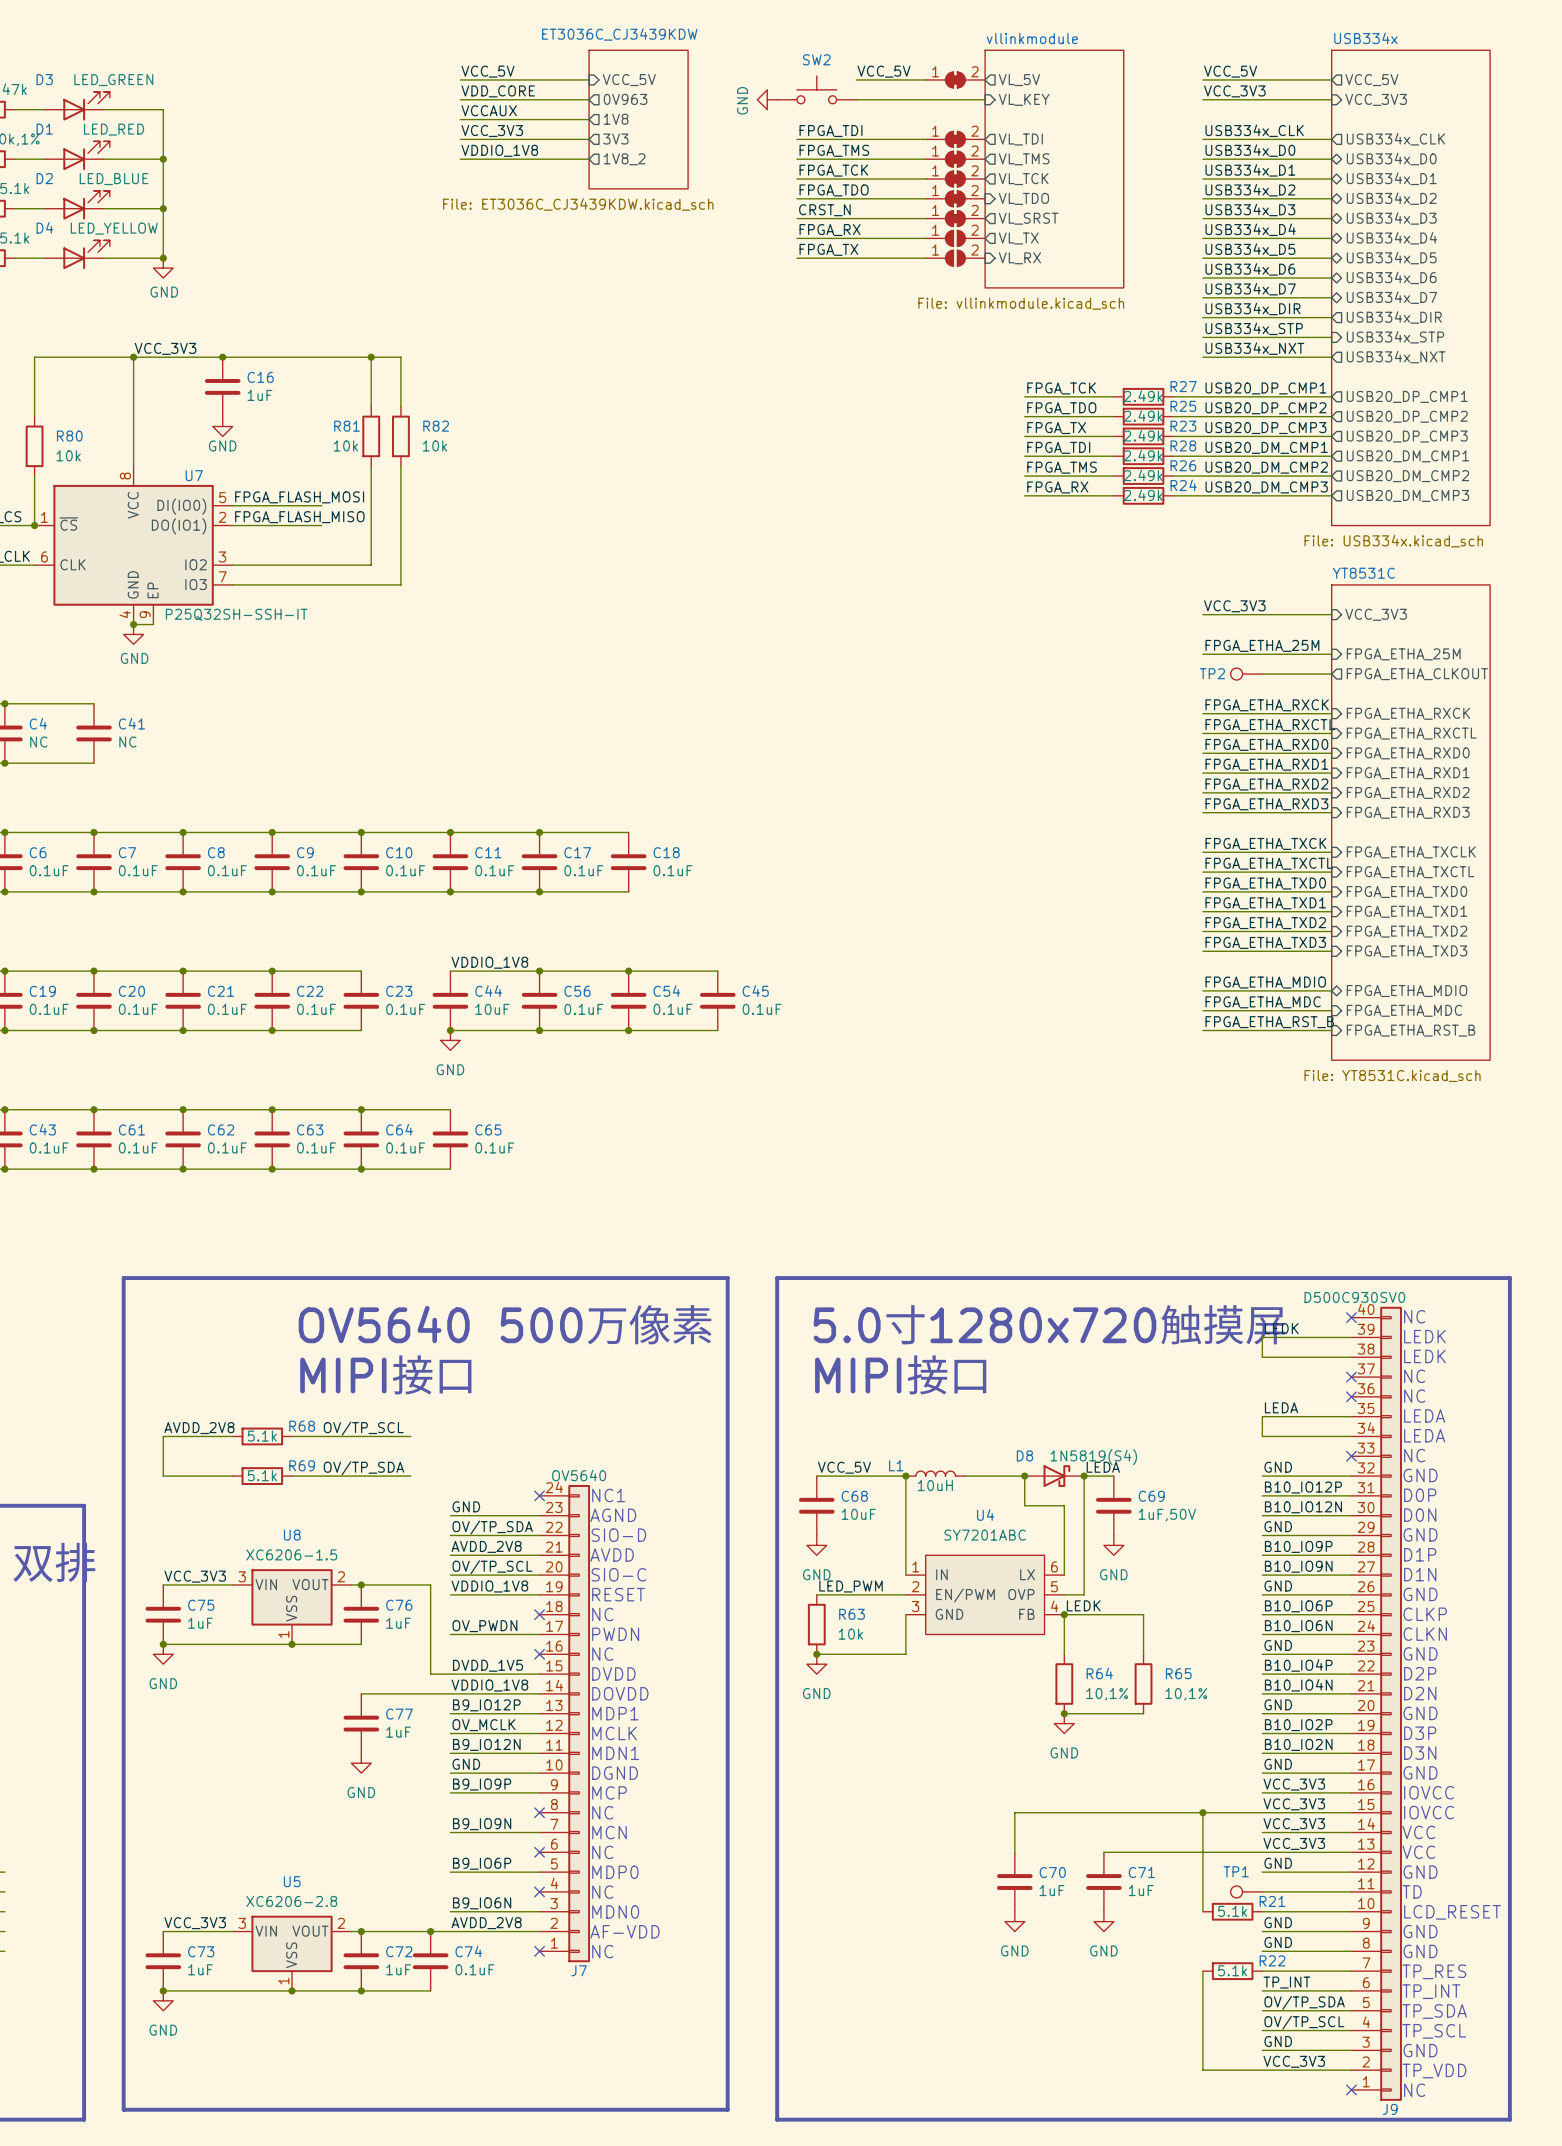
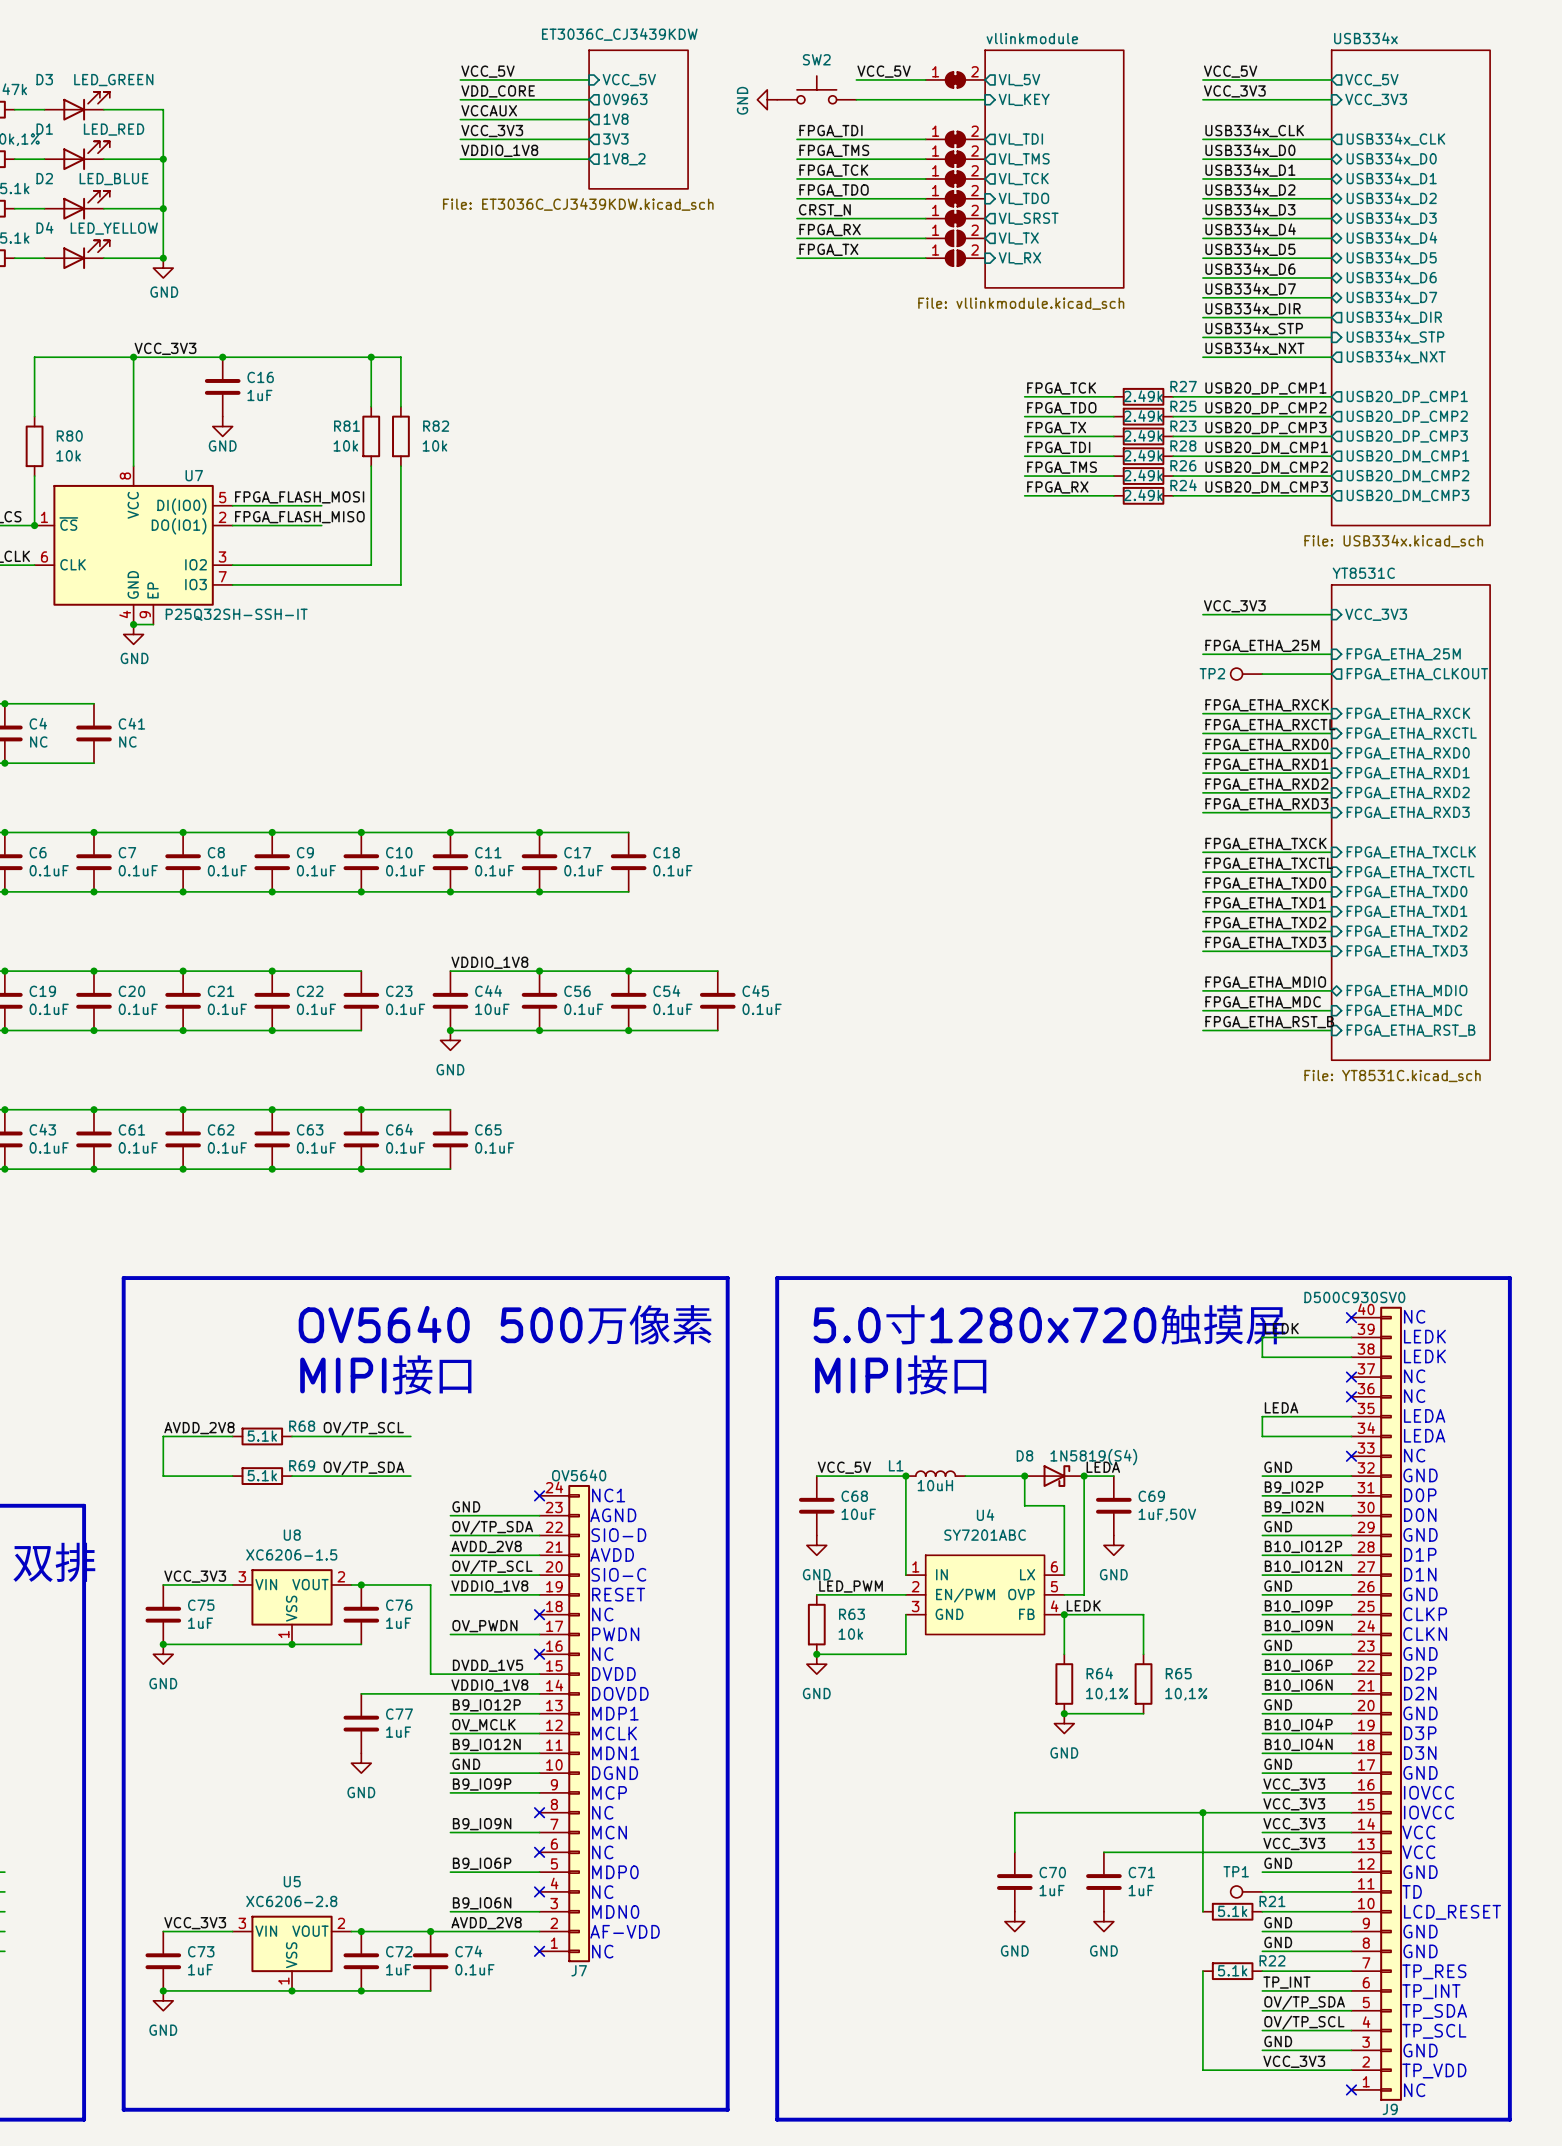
label: B10_IO12P (1303, 1487) -> B9_IO2P (1294, 1487)
label: B10_IO12N (1303, 1507) -> B9_IO2N (1294, 1507)
label: B10_IO9P (1298, 1546) -> B10_IO12P (1303, 1546)
label: B10_IO9N (1298, 1566) -> B10_IO12N (1303, 1566)
label: B10_IO6P (1298, 1606) -> B10_IO9P (1298, 1606)
label: B10_IO6N (1298, 1626) -> B10_IO9N (1298, 1626)
label: B10_IO4P (1298, 1665) -> B10_IO6P (1298, 1665)
label: B10_IO4N (1298, 1685) -> B10_IO6N (1298, 1685)
label: B10_IO2P (1298, 1725) -> B10_IO4P (1298, 1724)
label: B10_IO2N (1298, 1744) -> B10_IO4N (1298, 1744)

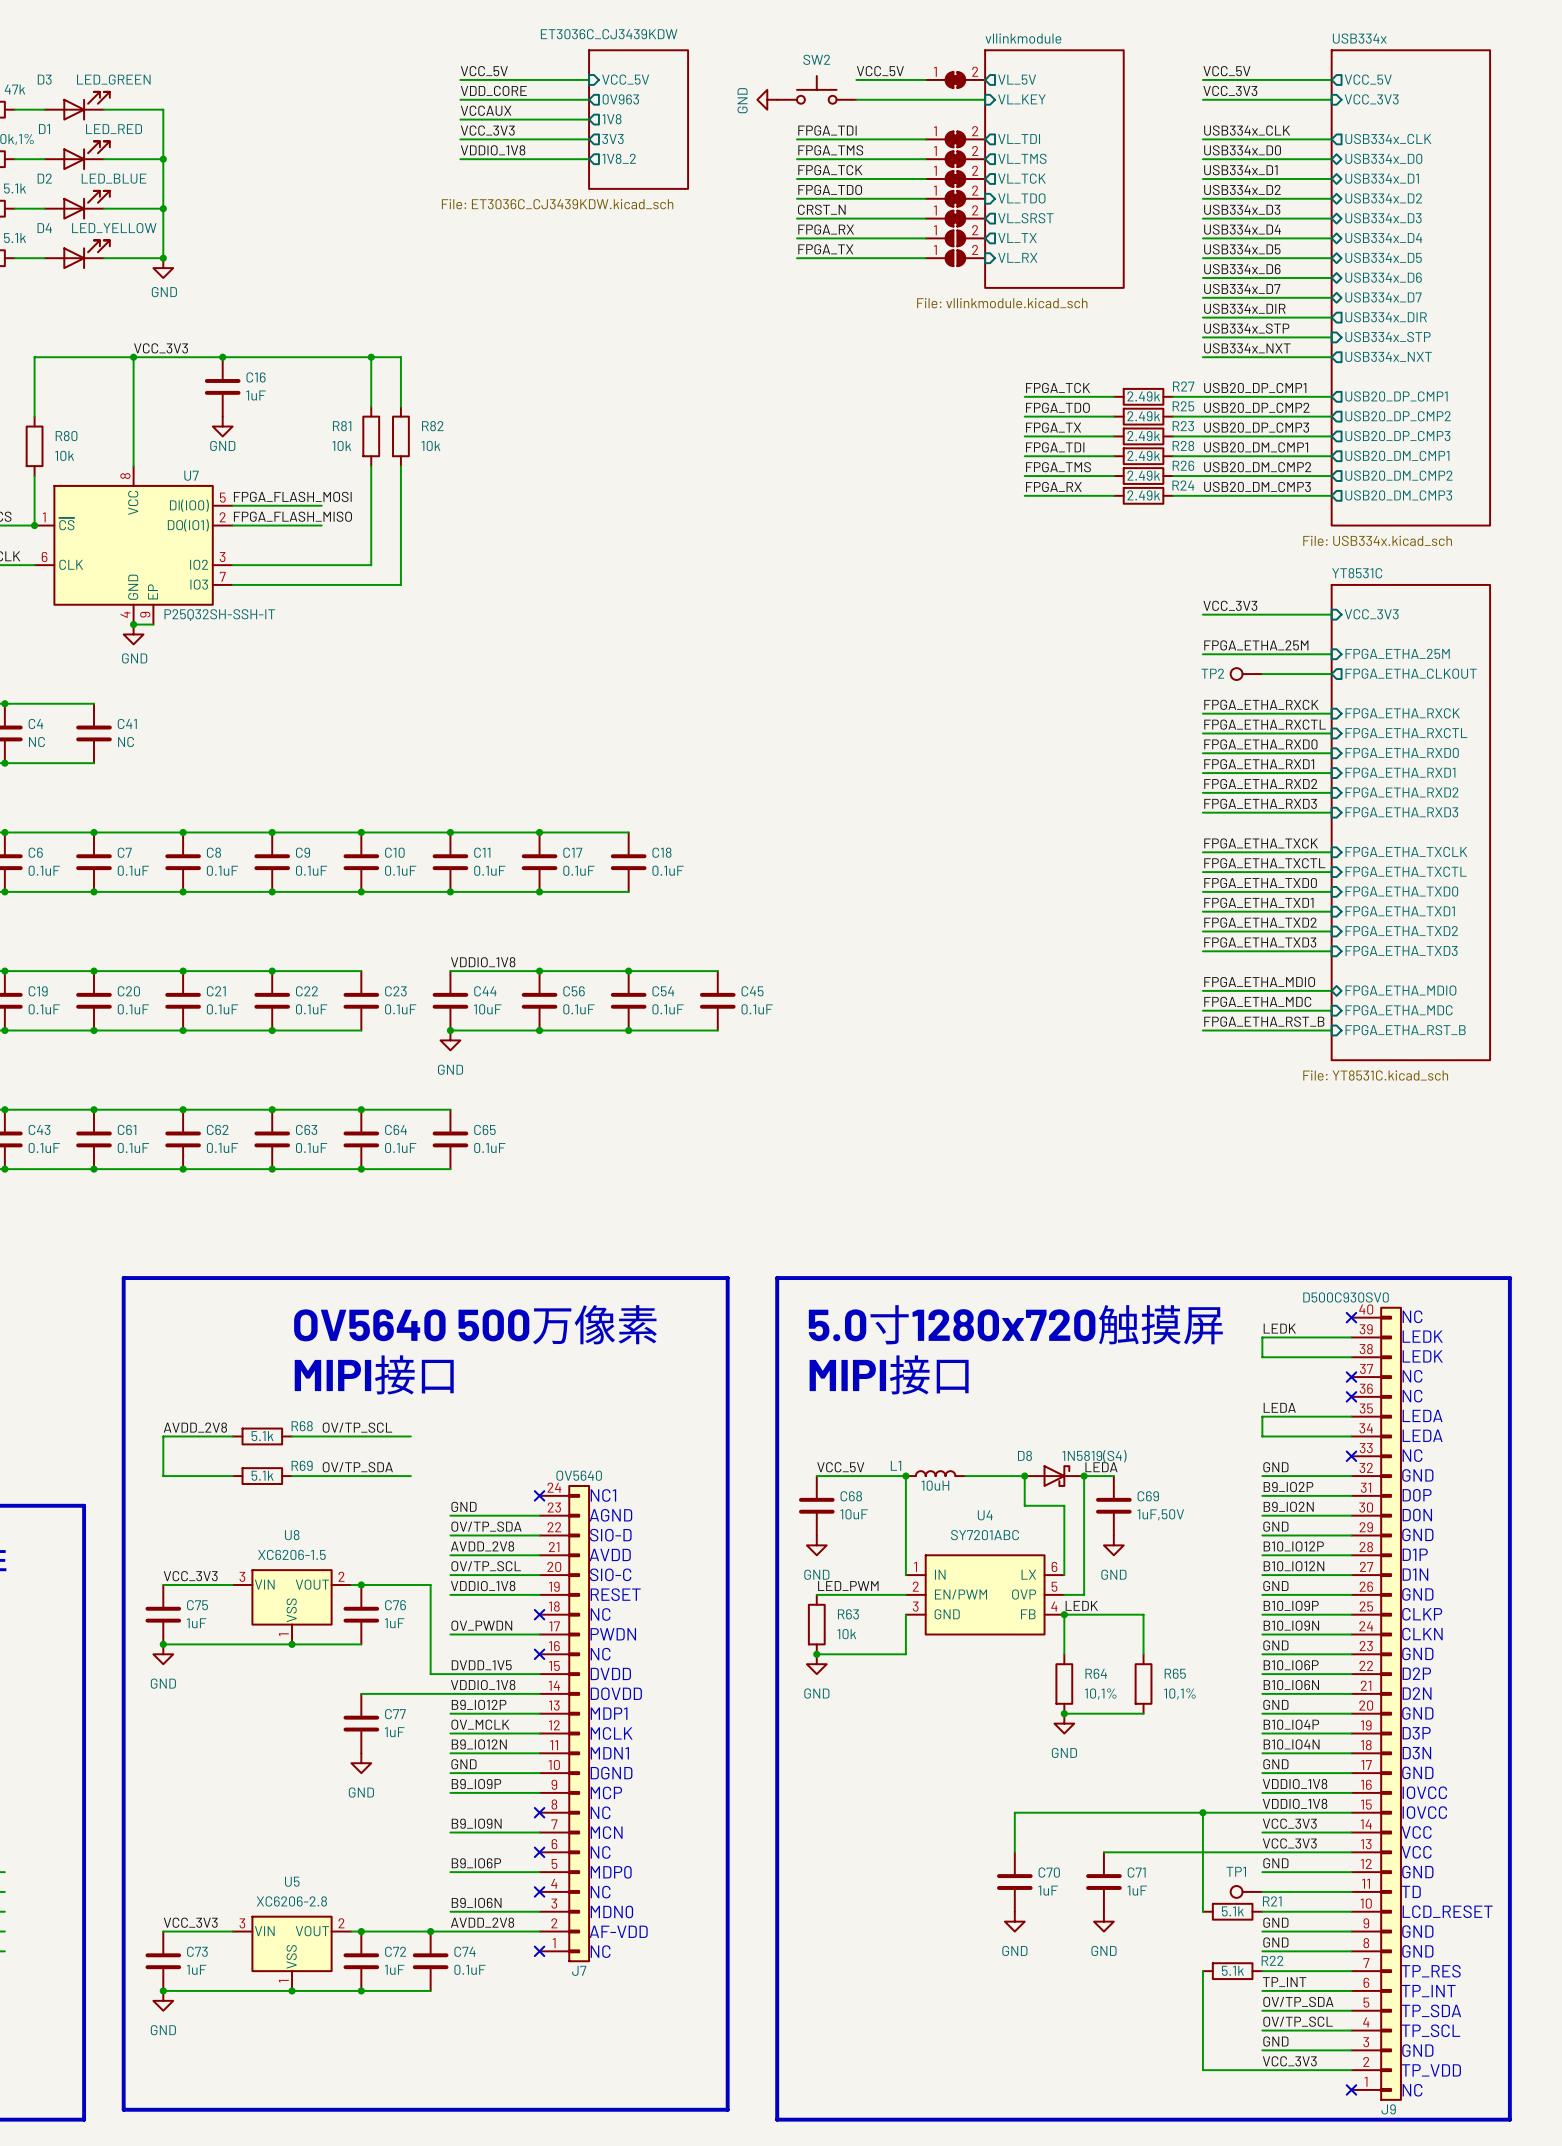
label: VCC_3V3 (1294, 1784) -> VDDIO_1V8 (1295, 1784)
label: VCC_3V3 (1294, 1804) -> VDDIO_1V8 (1295, 1803)

